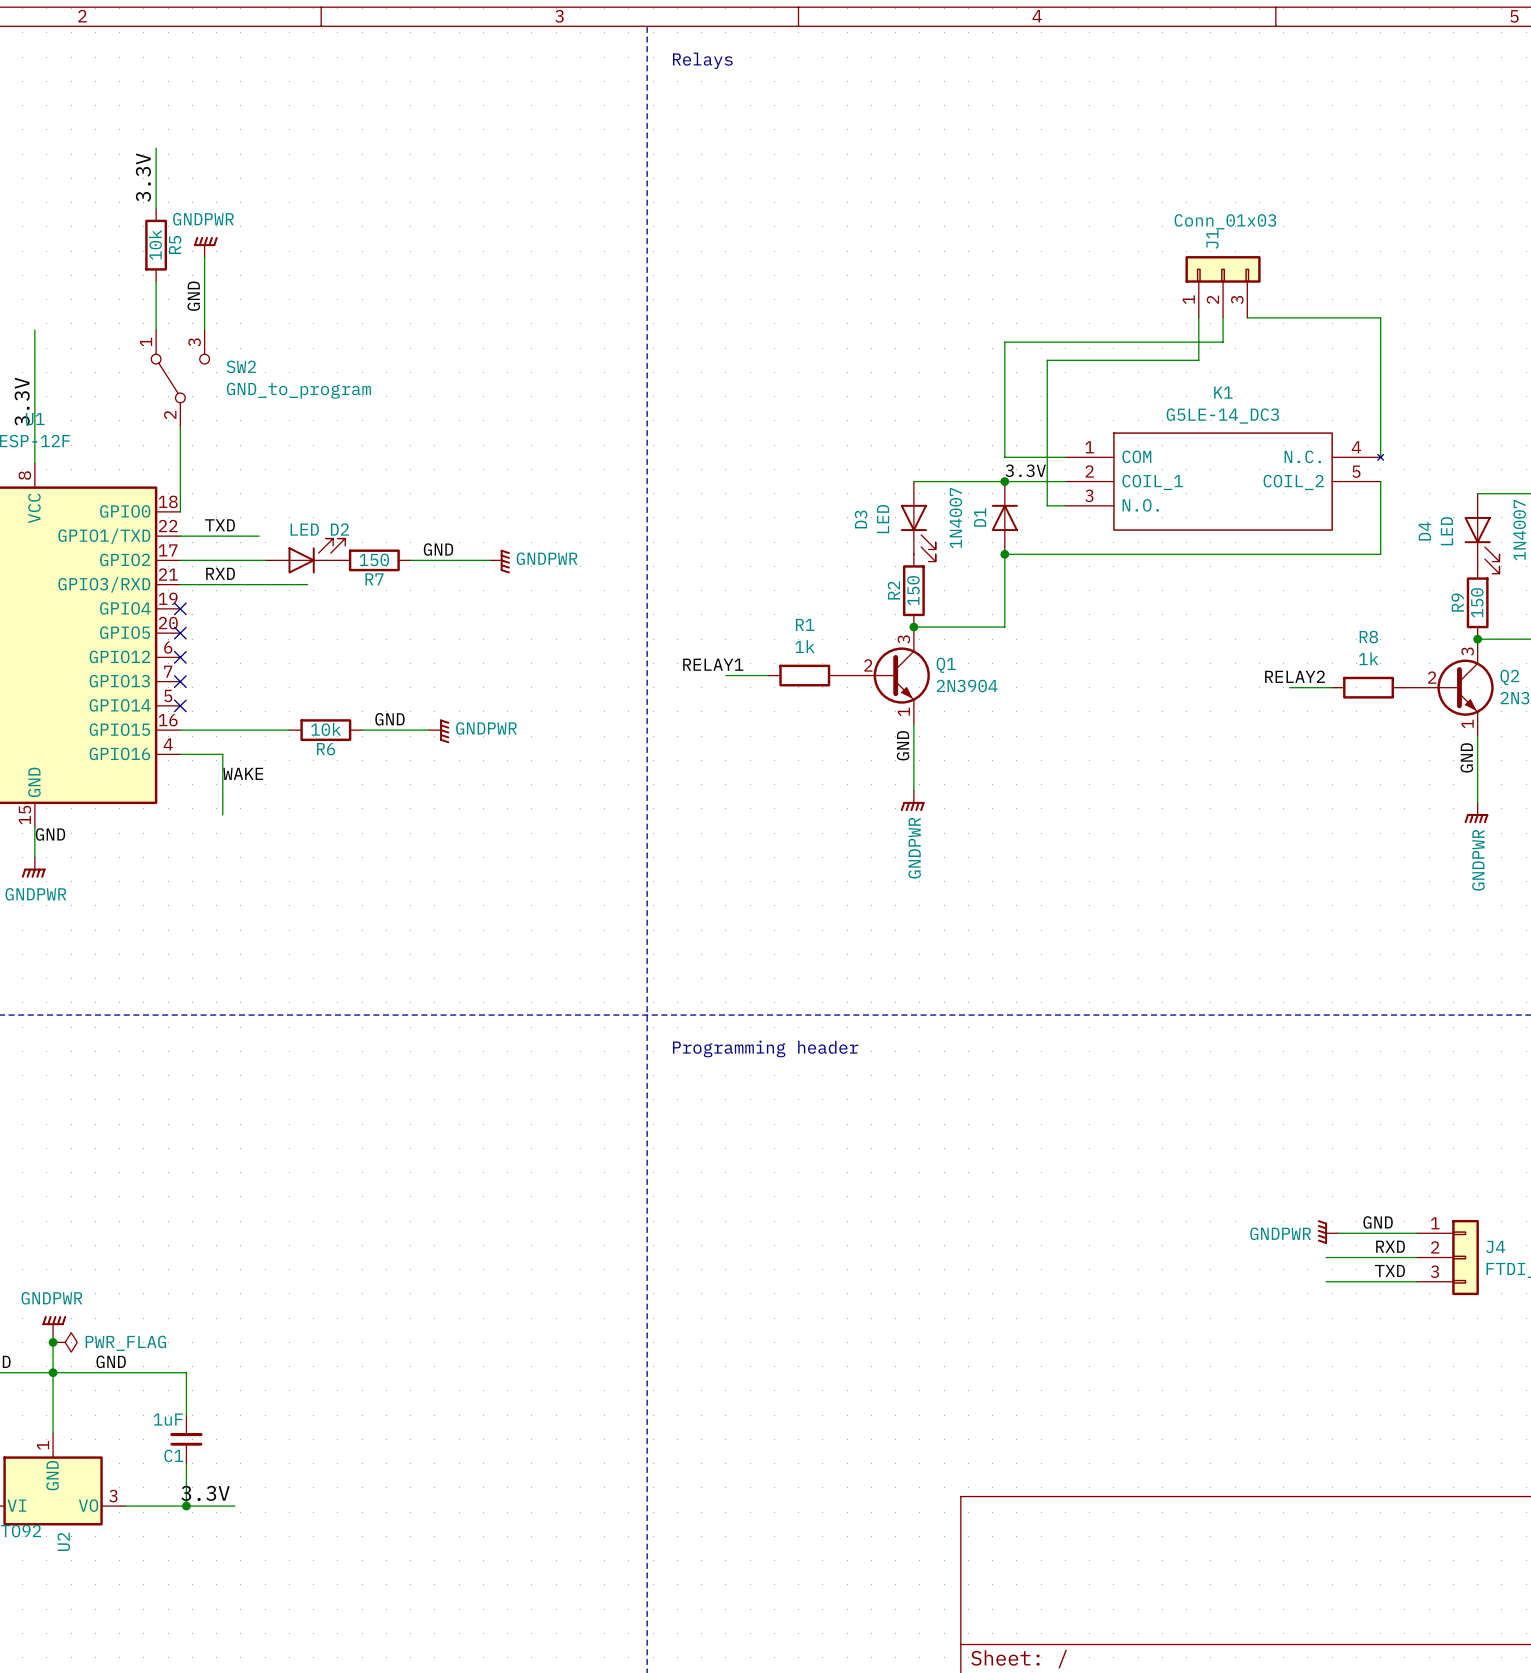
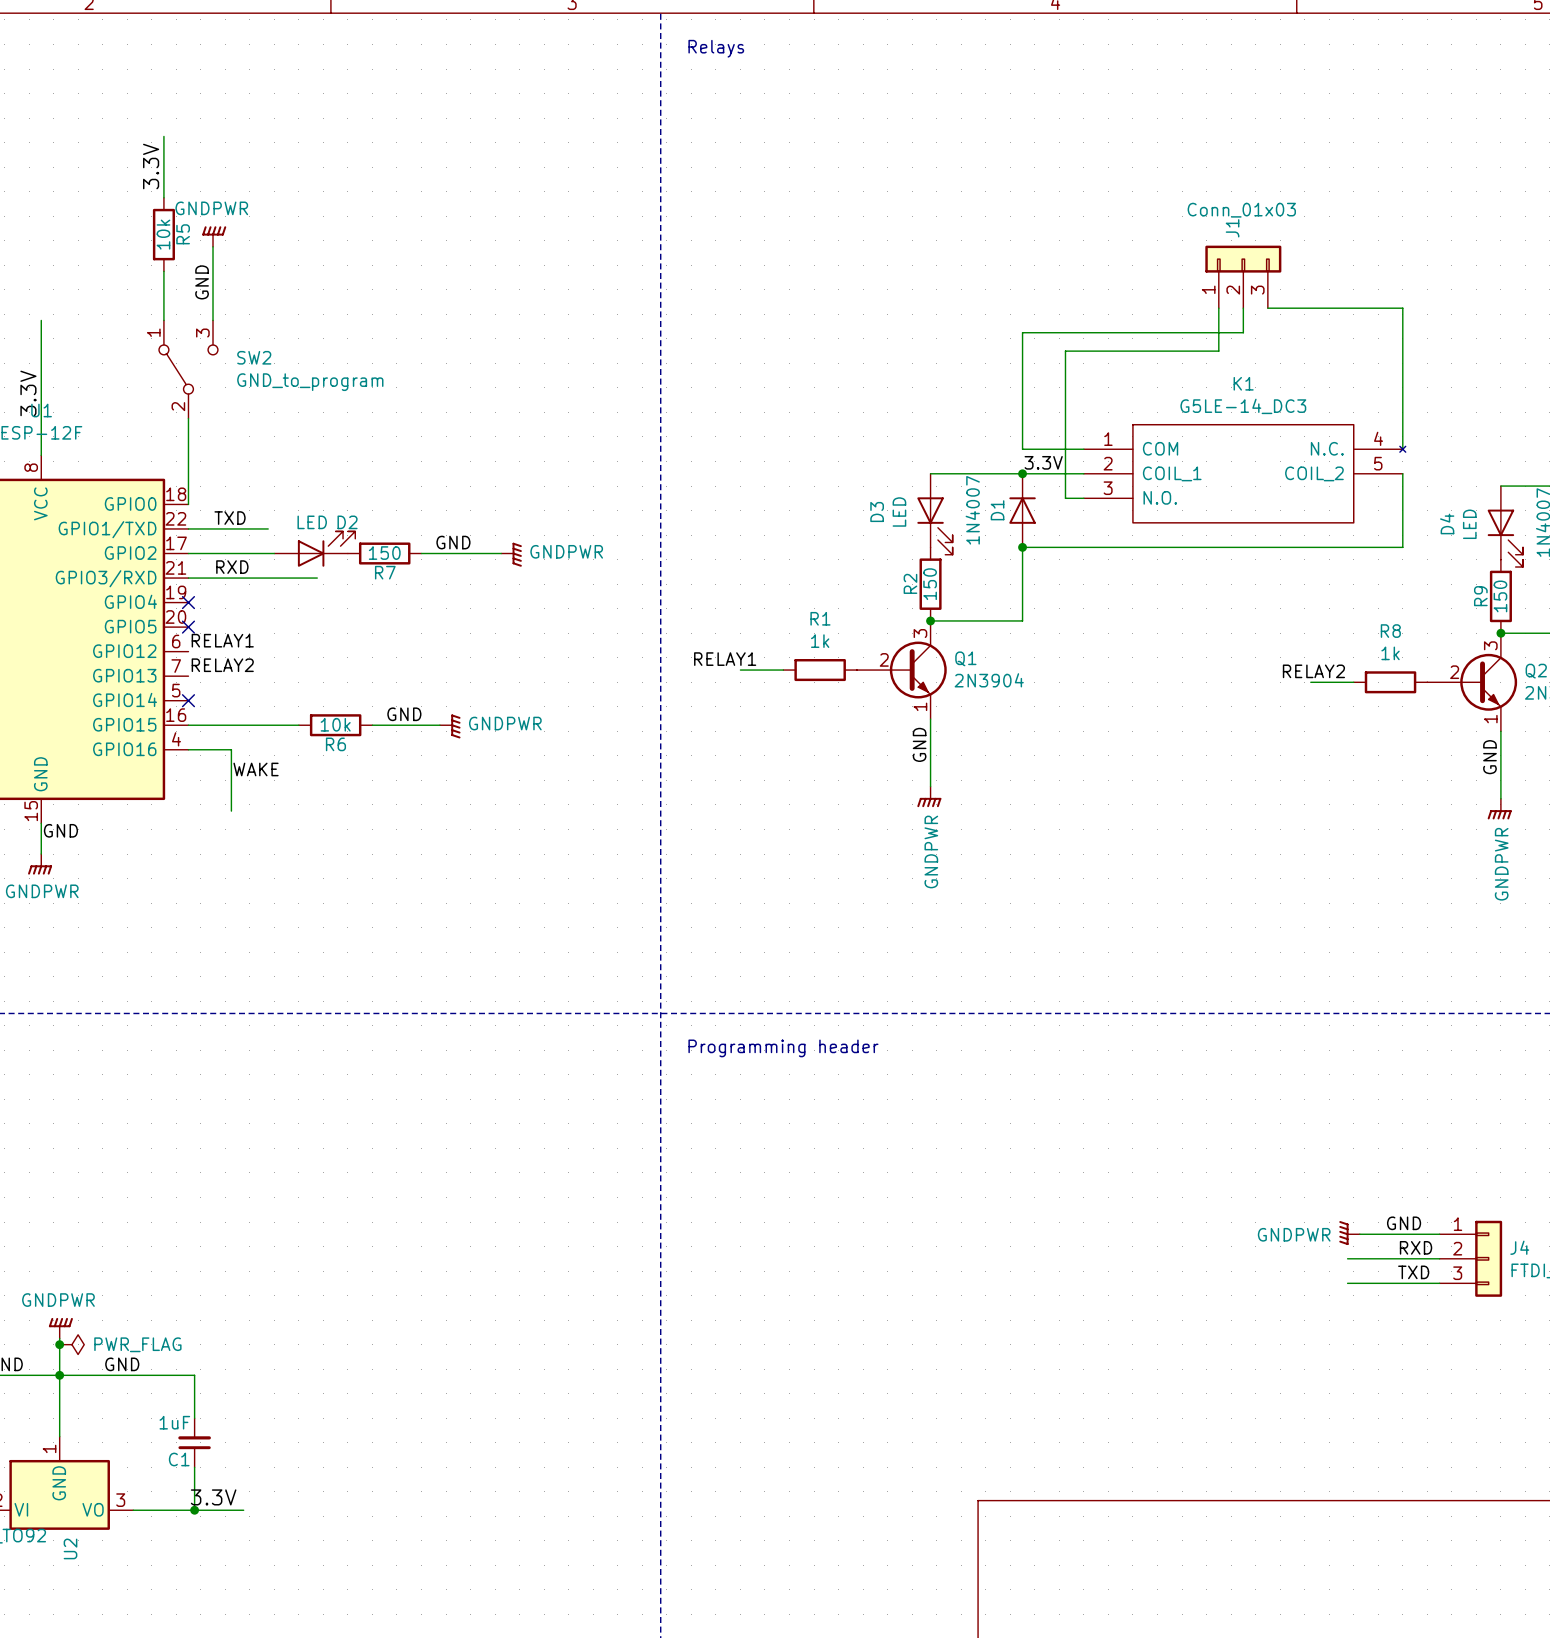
label: none -> RELAY1 (222, 640)
no-connect mark: (180, 657) -> none
label: none -> RELAY2 (222, 665)
no-connect mark: (180, 681) -> none

